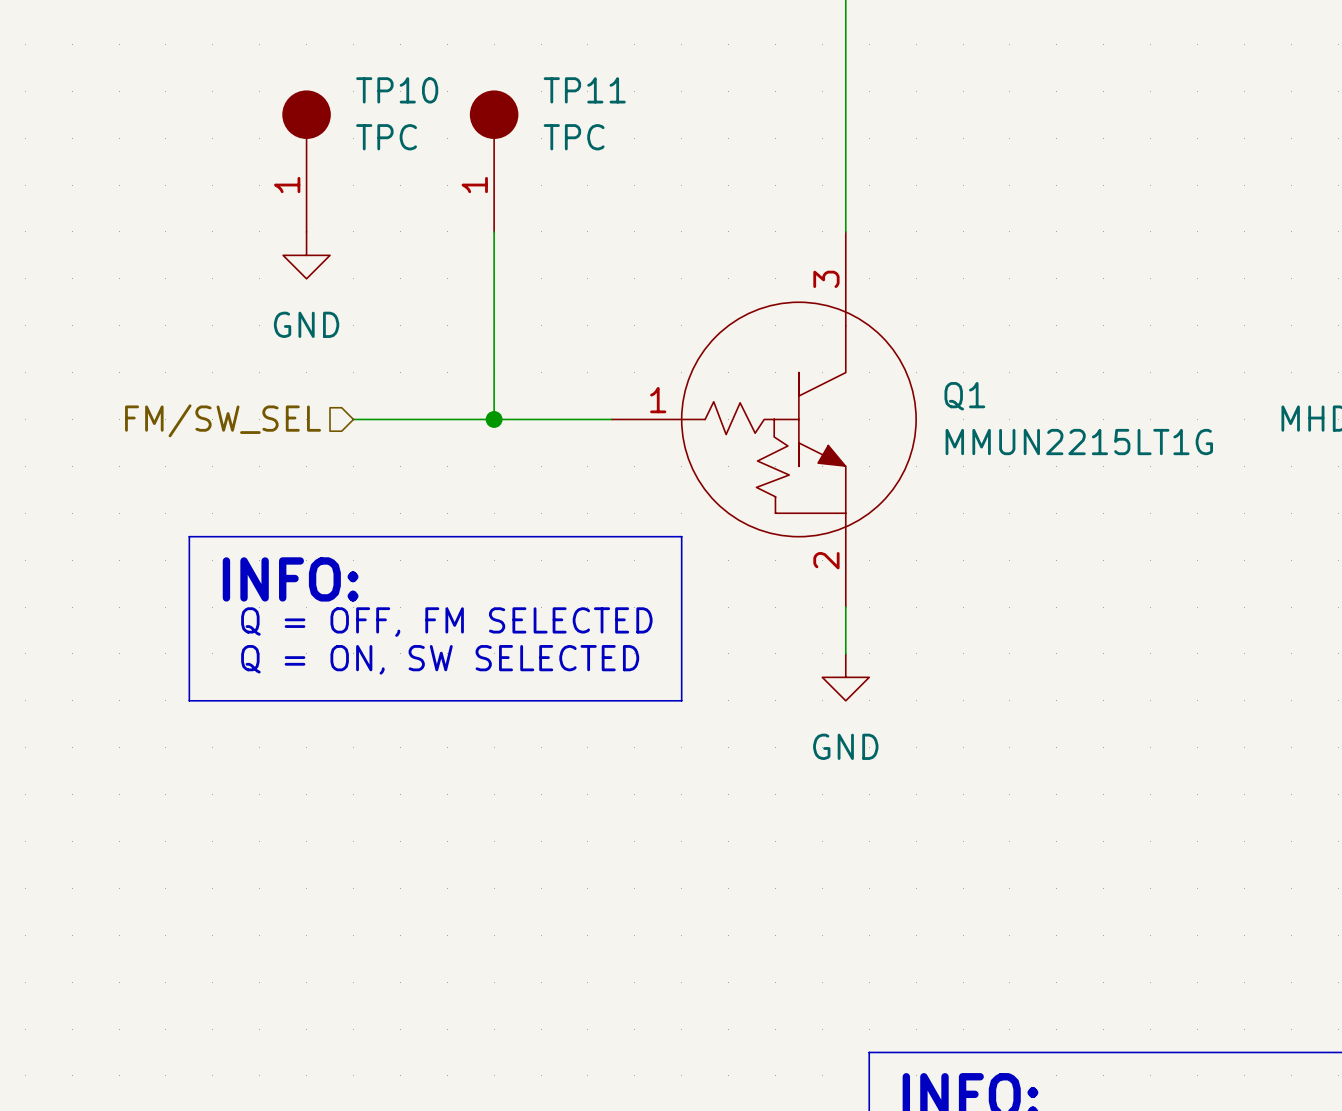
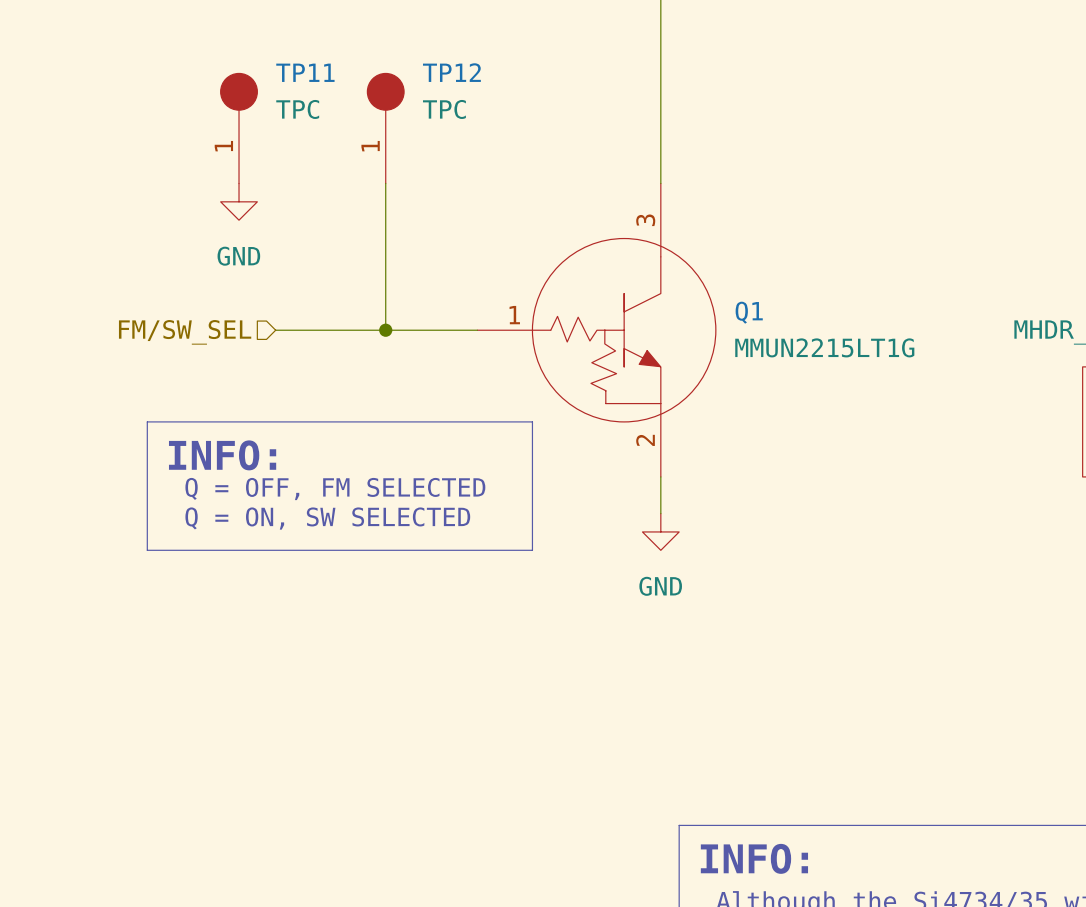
TP10 name: TP10 (397, 90) -> TP11 (305, 72)
TP11 name: TP11 (584, 90) -> TP12 (451, 72)

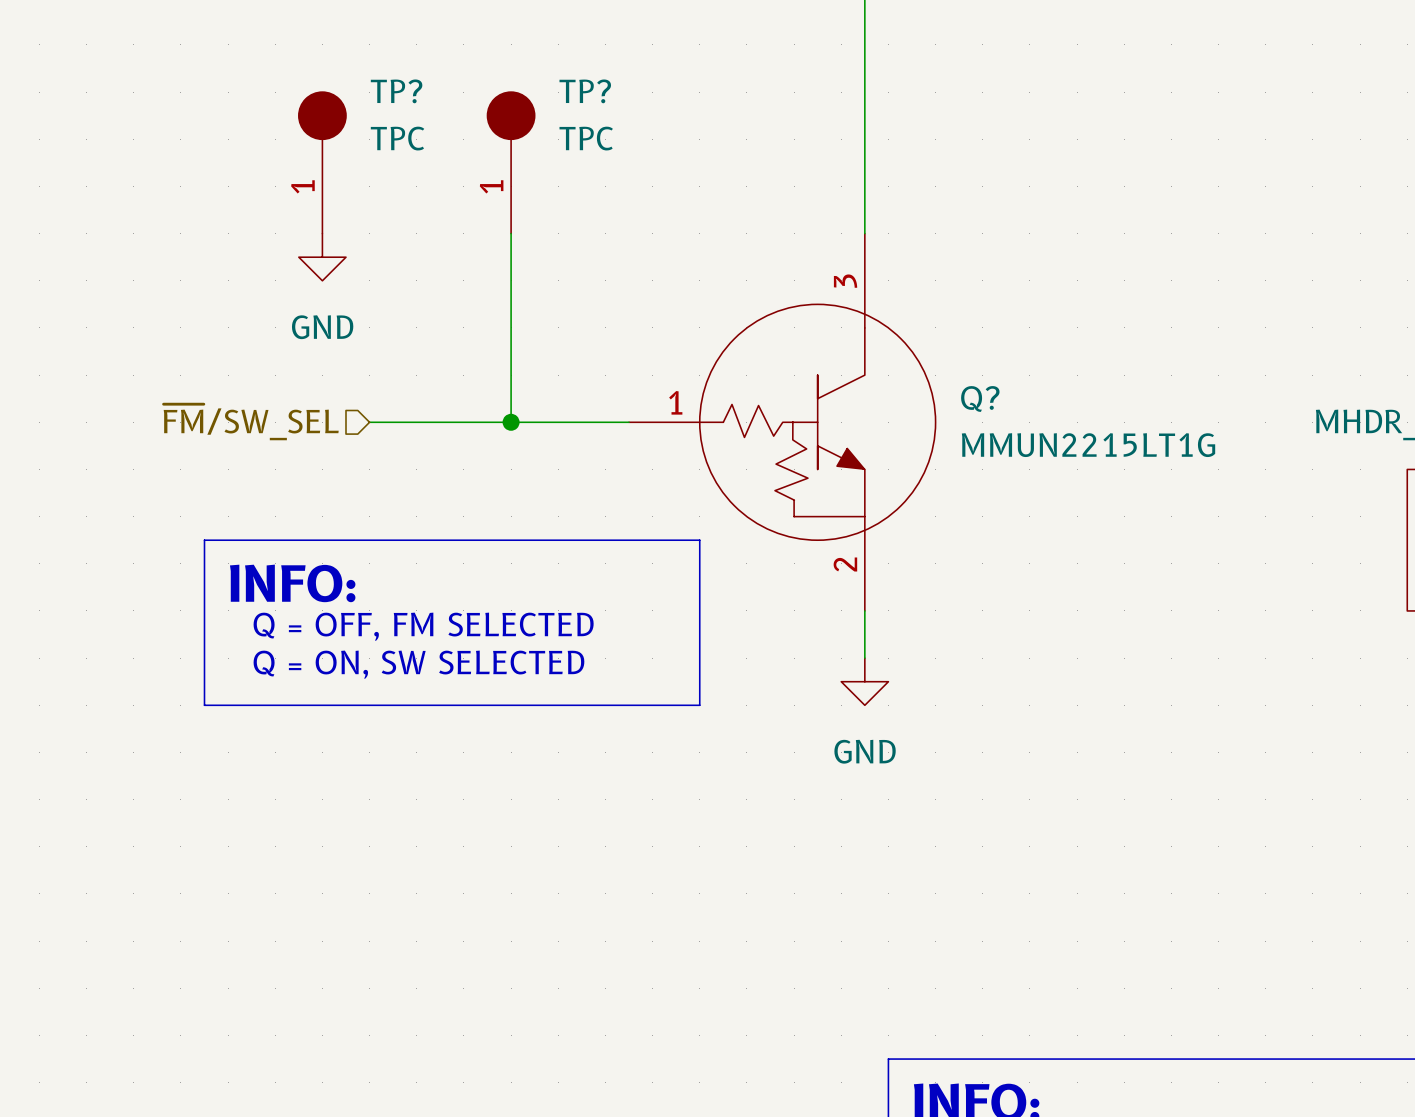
TP11 name: TP11 (305, 72) -> TP? (396, 91)
TP12 name: TP12 (451, 72) -> TP? (585, 91)
Q1 name: Q1 (749, 312) -> Q? (980, 398)
hierarchical label: FM/SW_SEL (185, 332) -> ~{FM}/SW_SEL (251, 422)

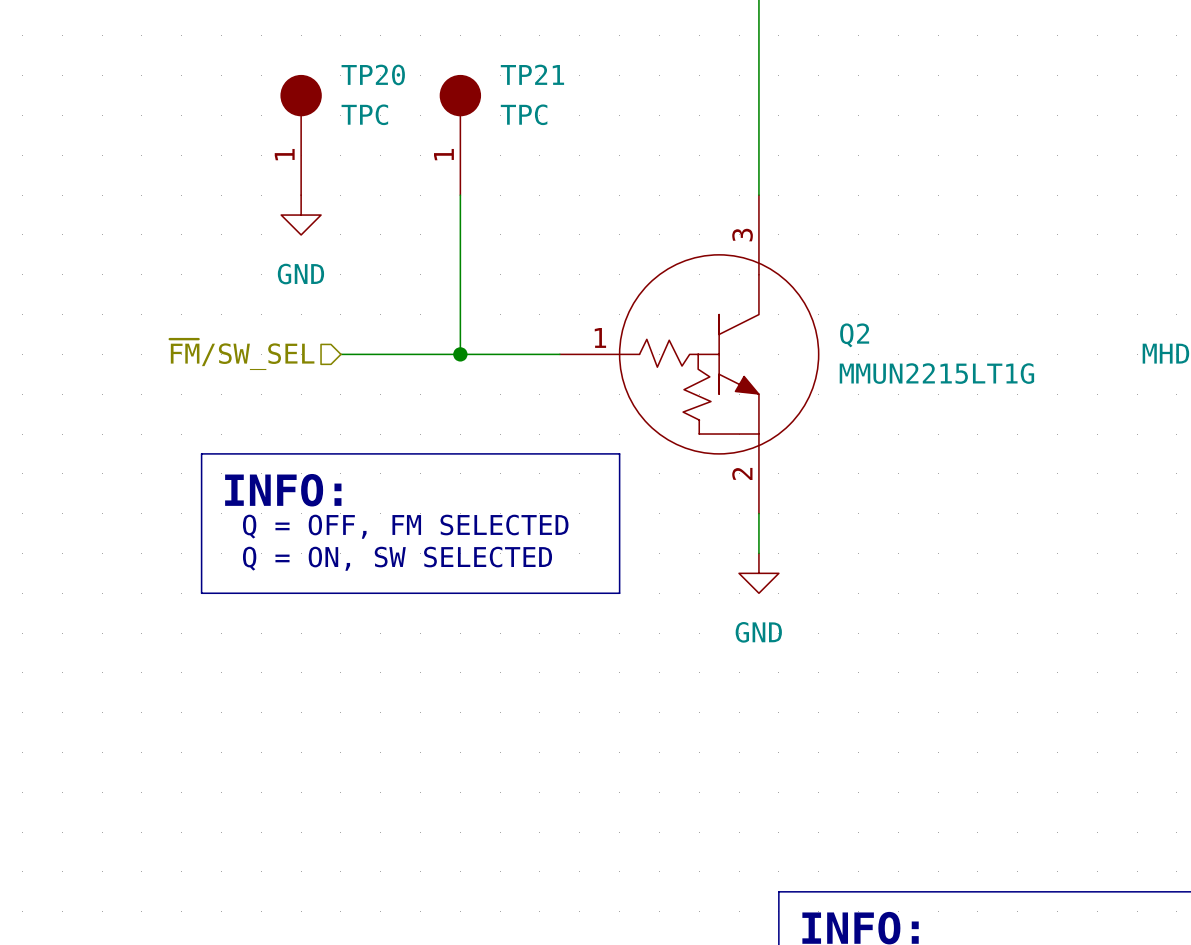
TP? name: TP? (396, 91) -> TP20 (373, 74)
TP? name: TP? (585, 91) -> TP21 (532, 74)
Q? name: Q? (980, 398) -> Q2 (854, 335)

